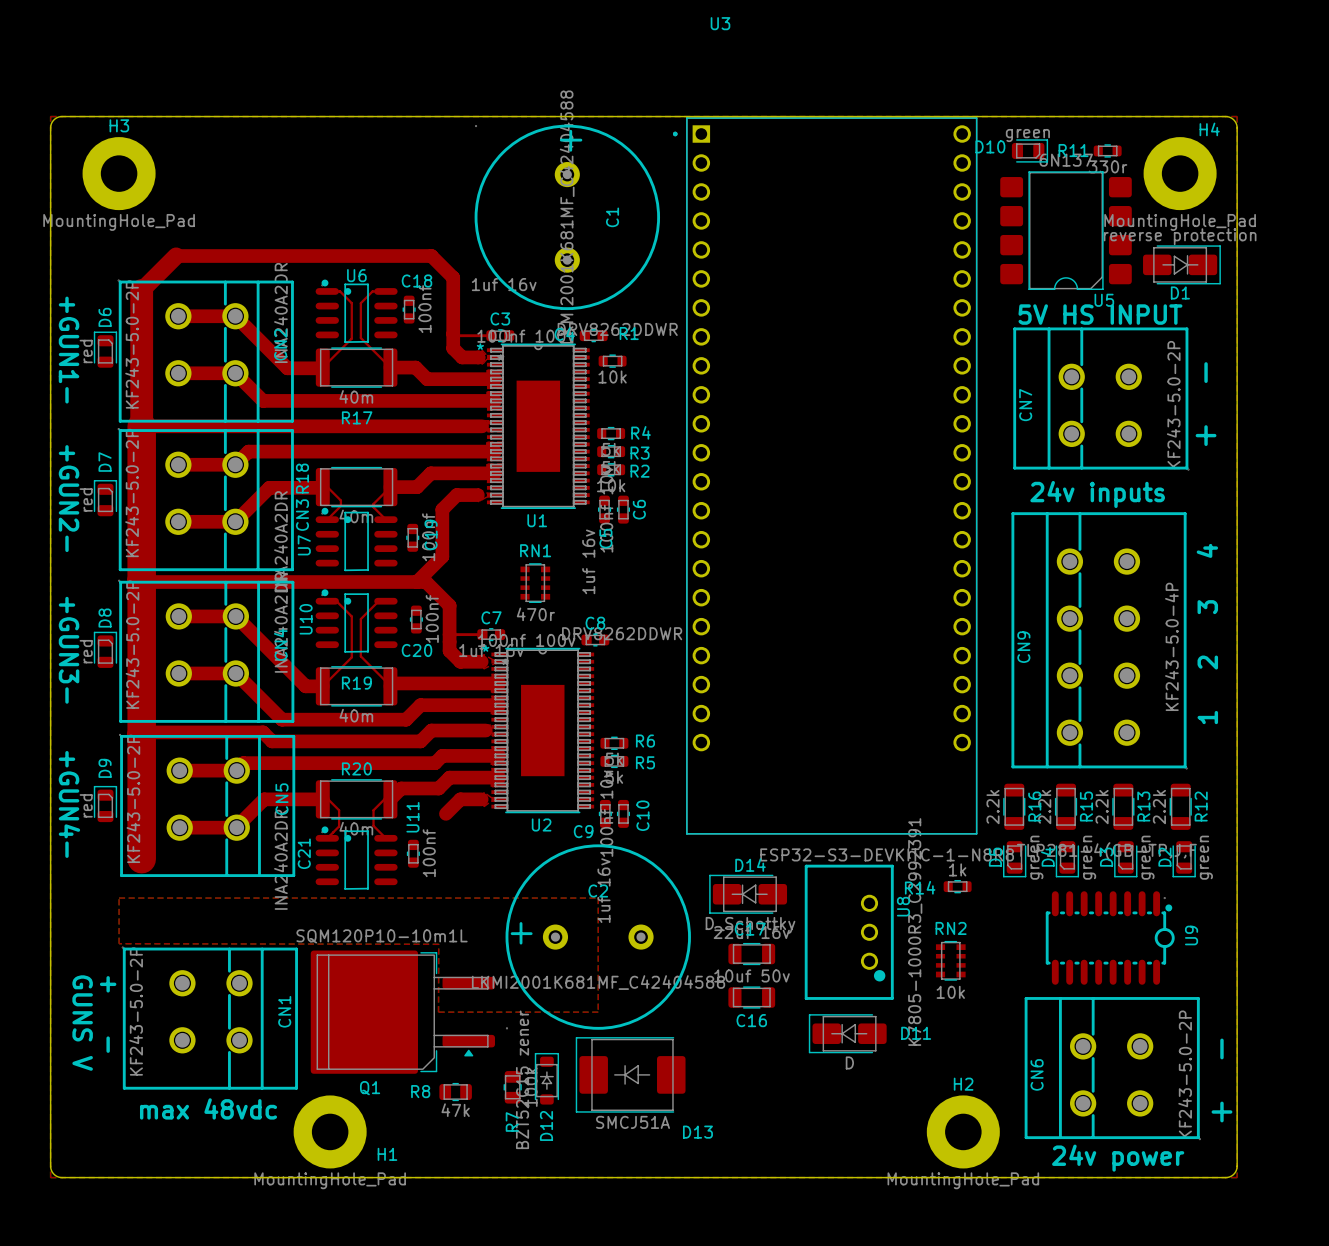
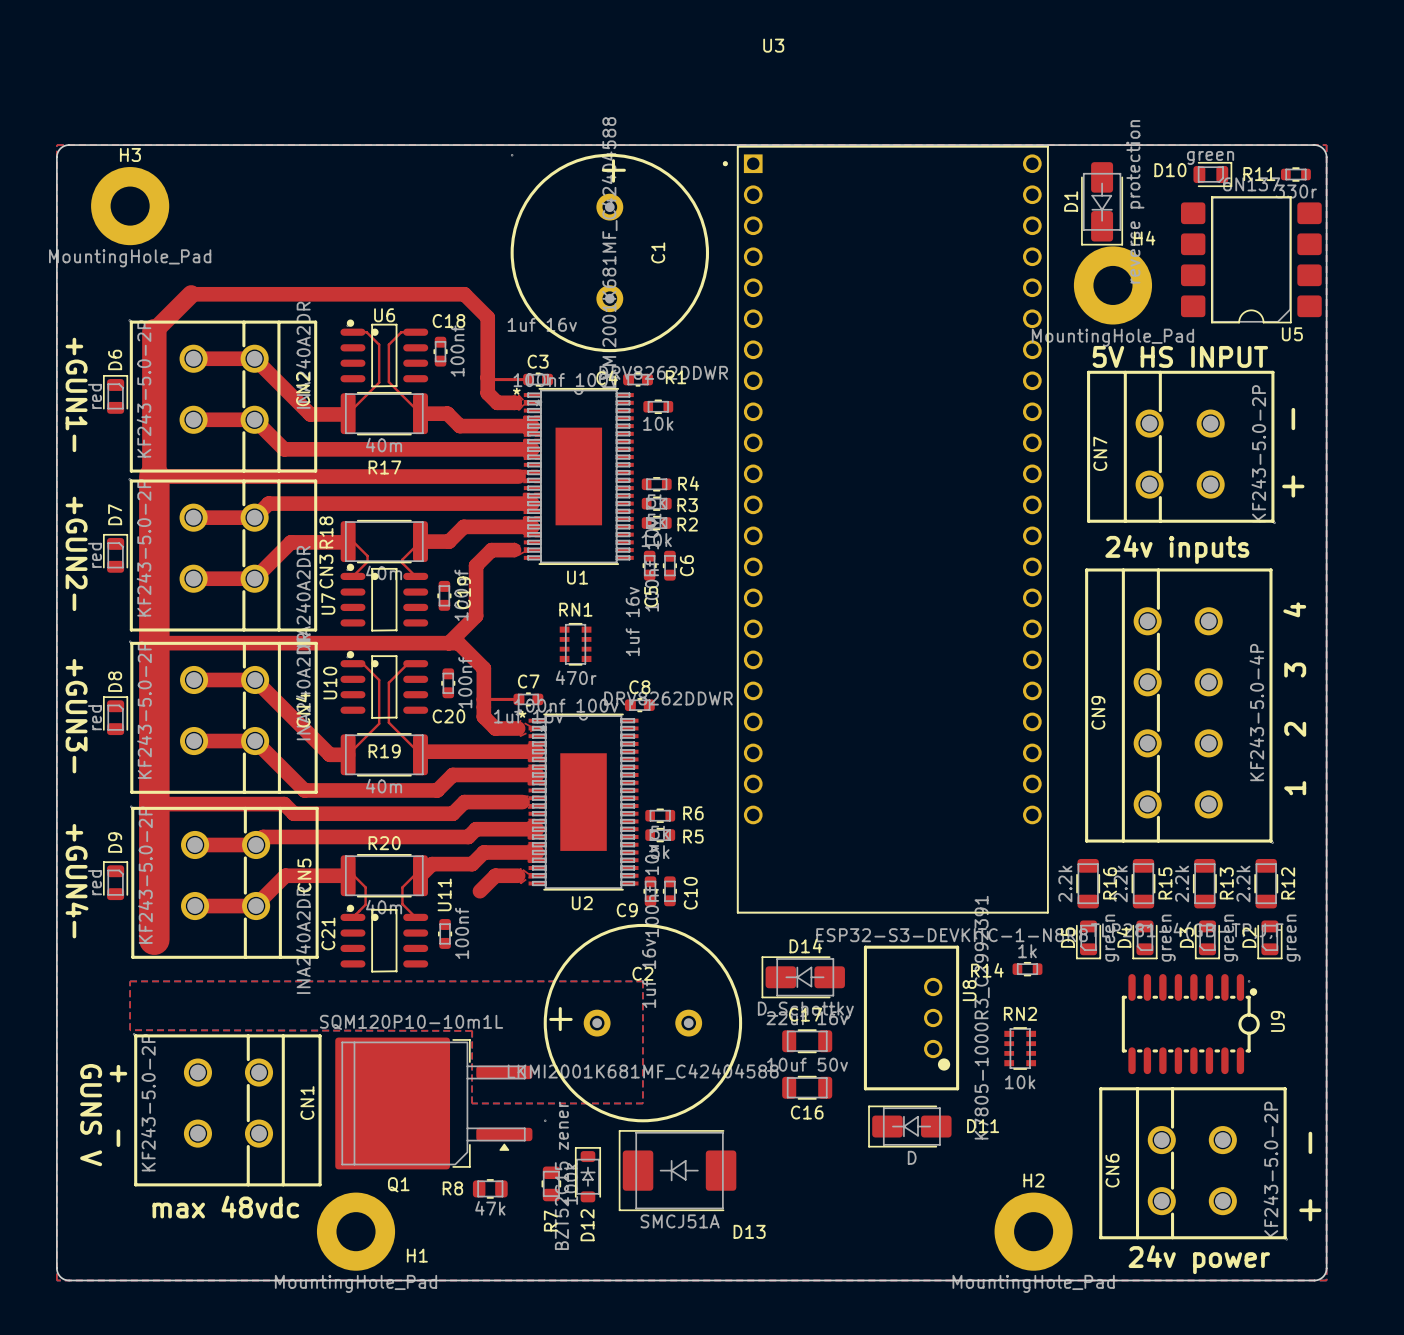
D10 position: (1029, 150) -> (1212, 174)
R11 position: (1107, 150) -> (1295, 174)
H4 position: (1180, 173) -> (1112, 285)
U5 position: (1066, 230) -> (1251, 259)
D1 rotation: 0° (1181, 264) -> 90° clockwise (1102, 203)
D1 position: (1181, 264) -> (1102, 203)

